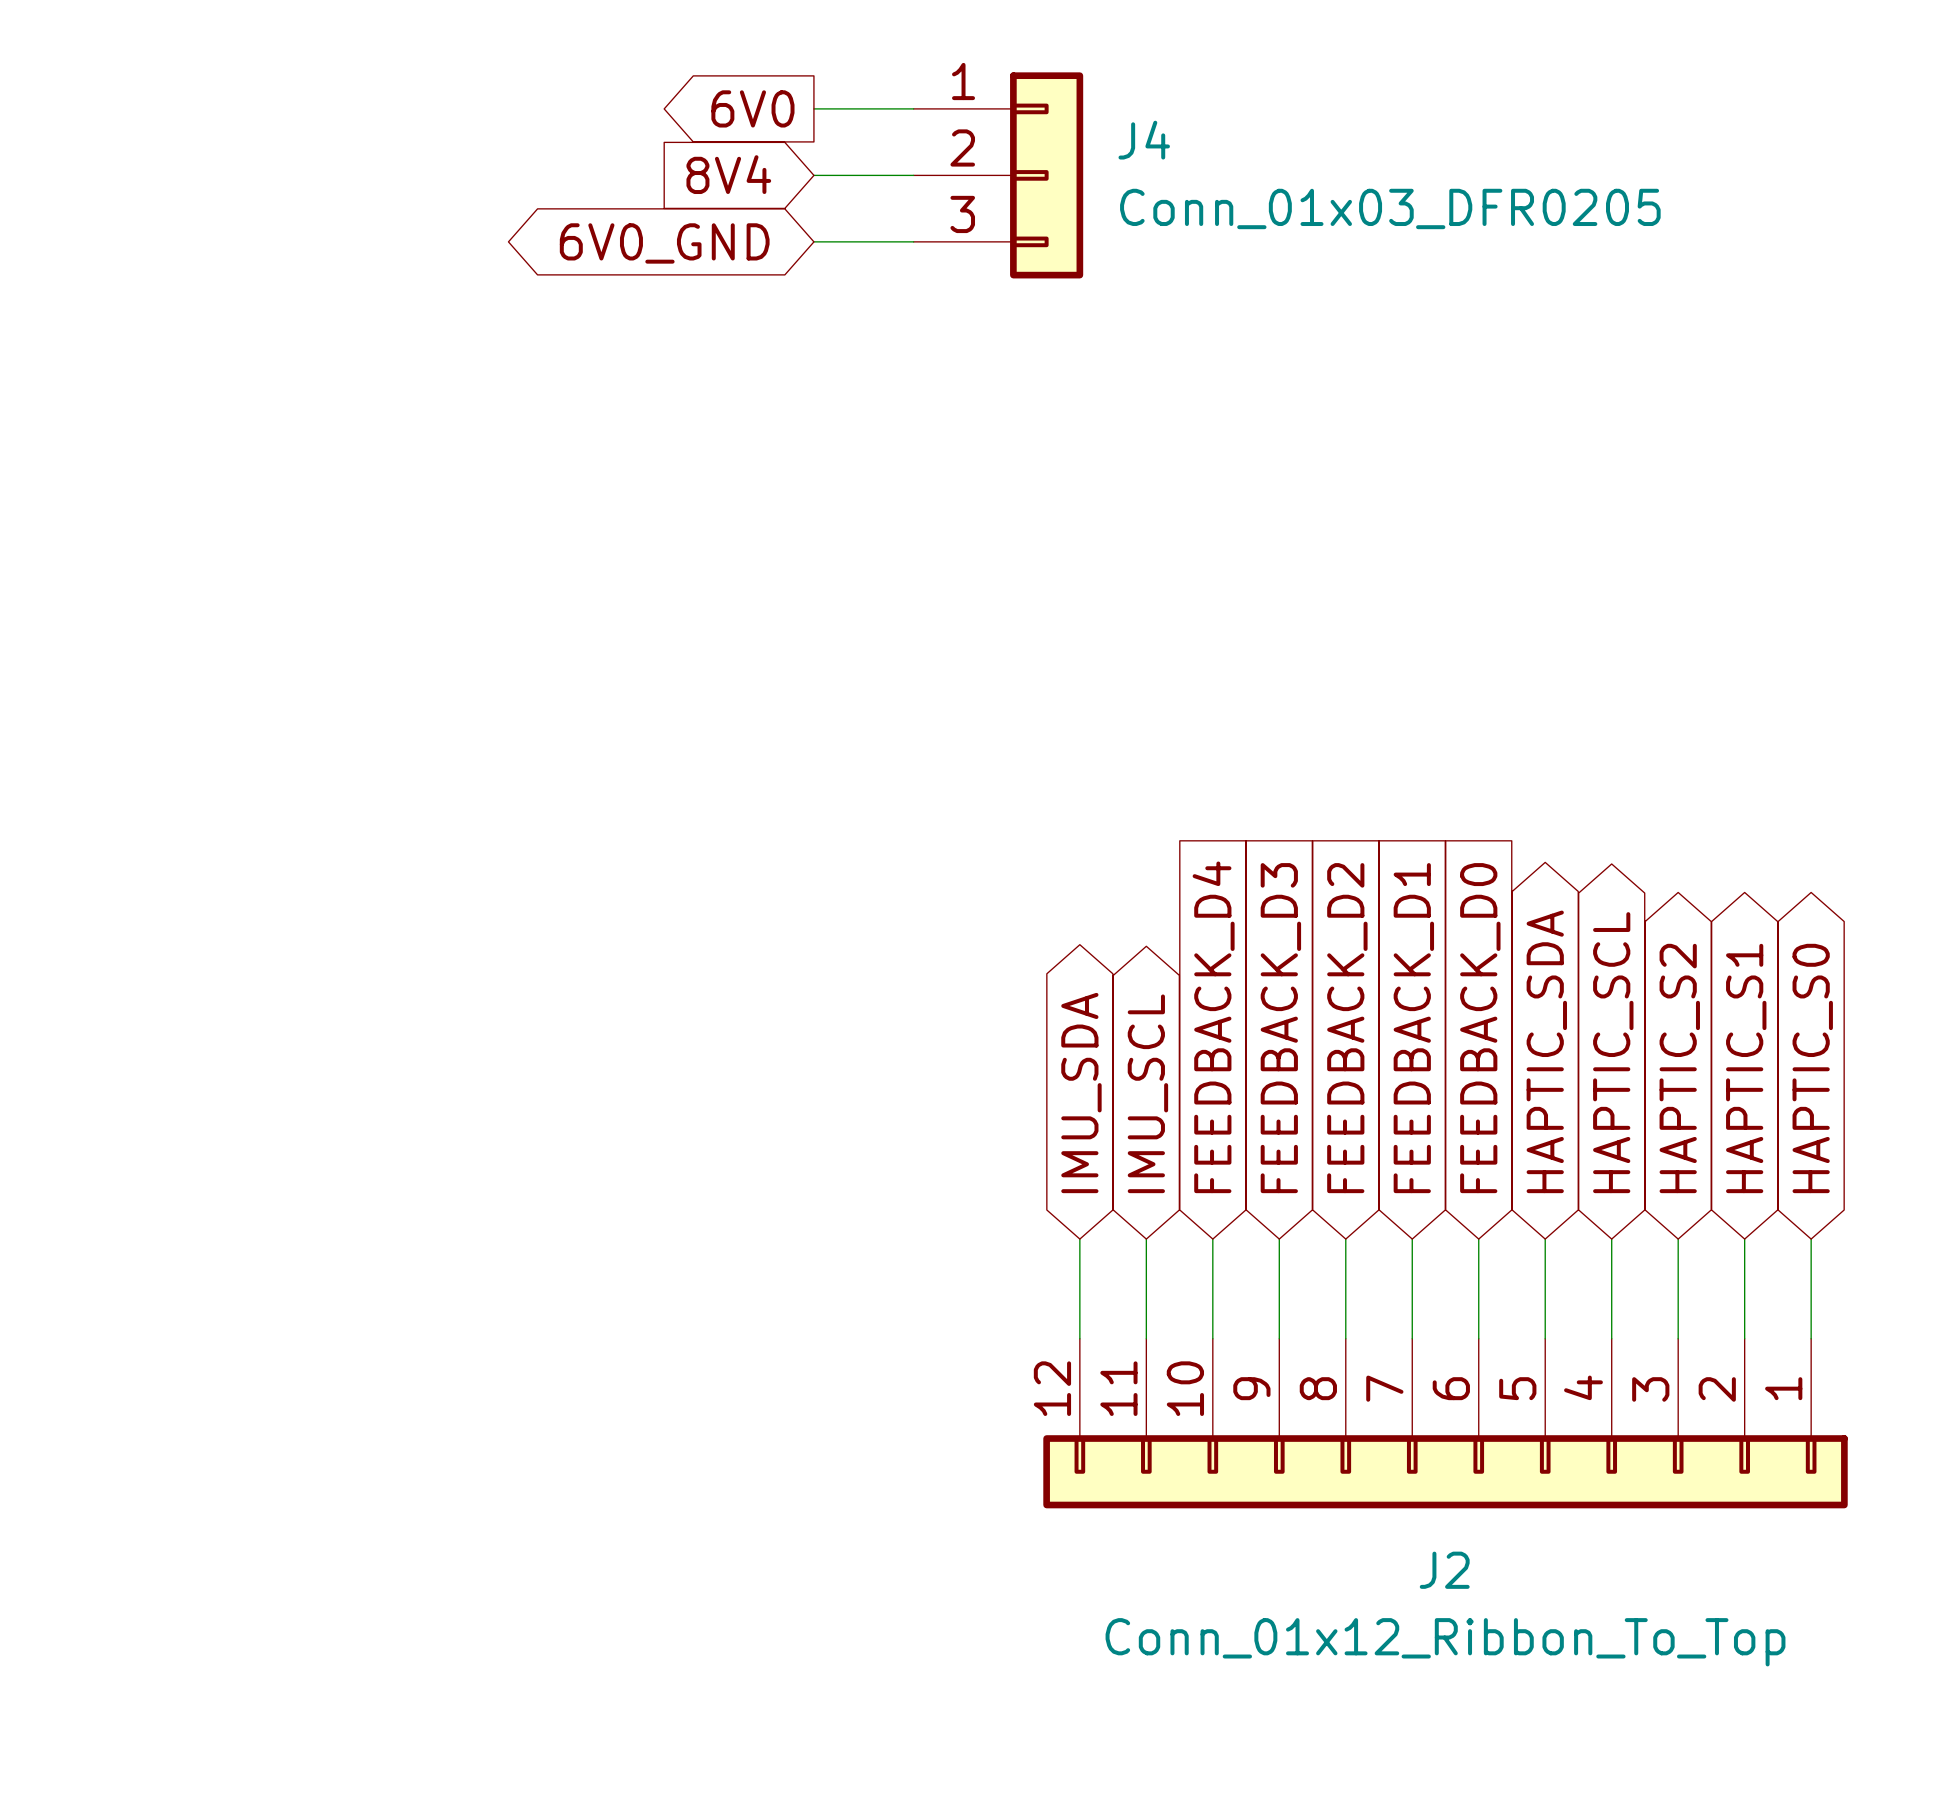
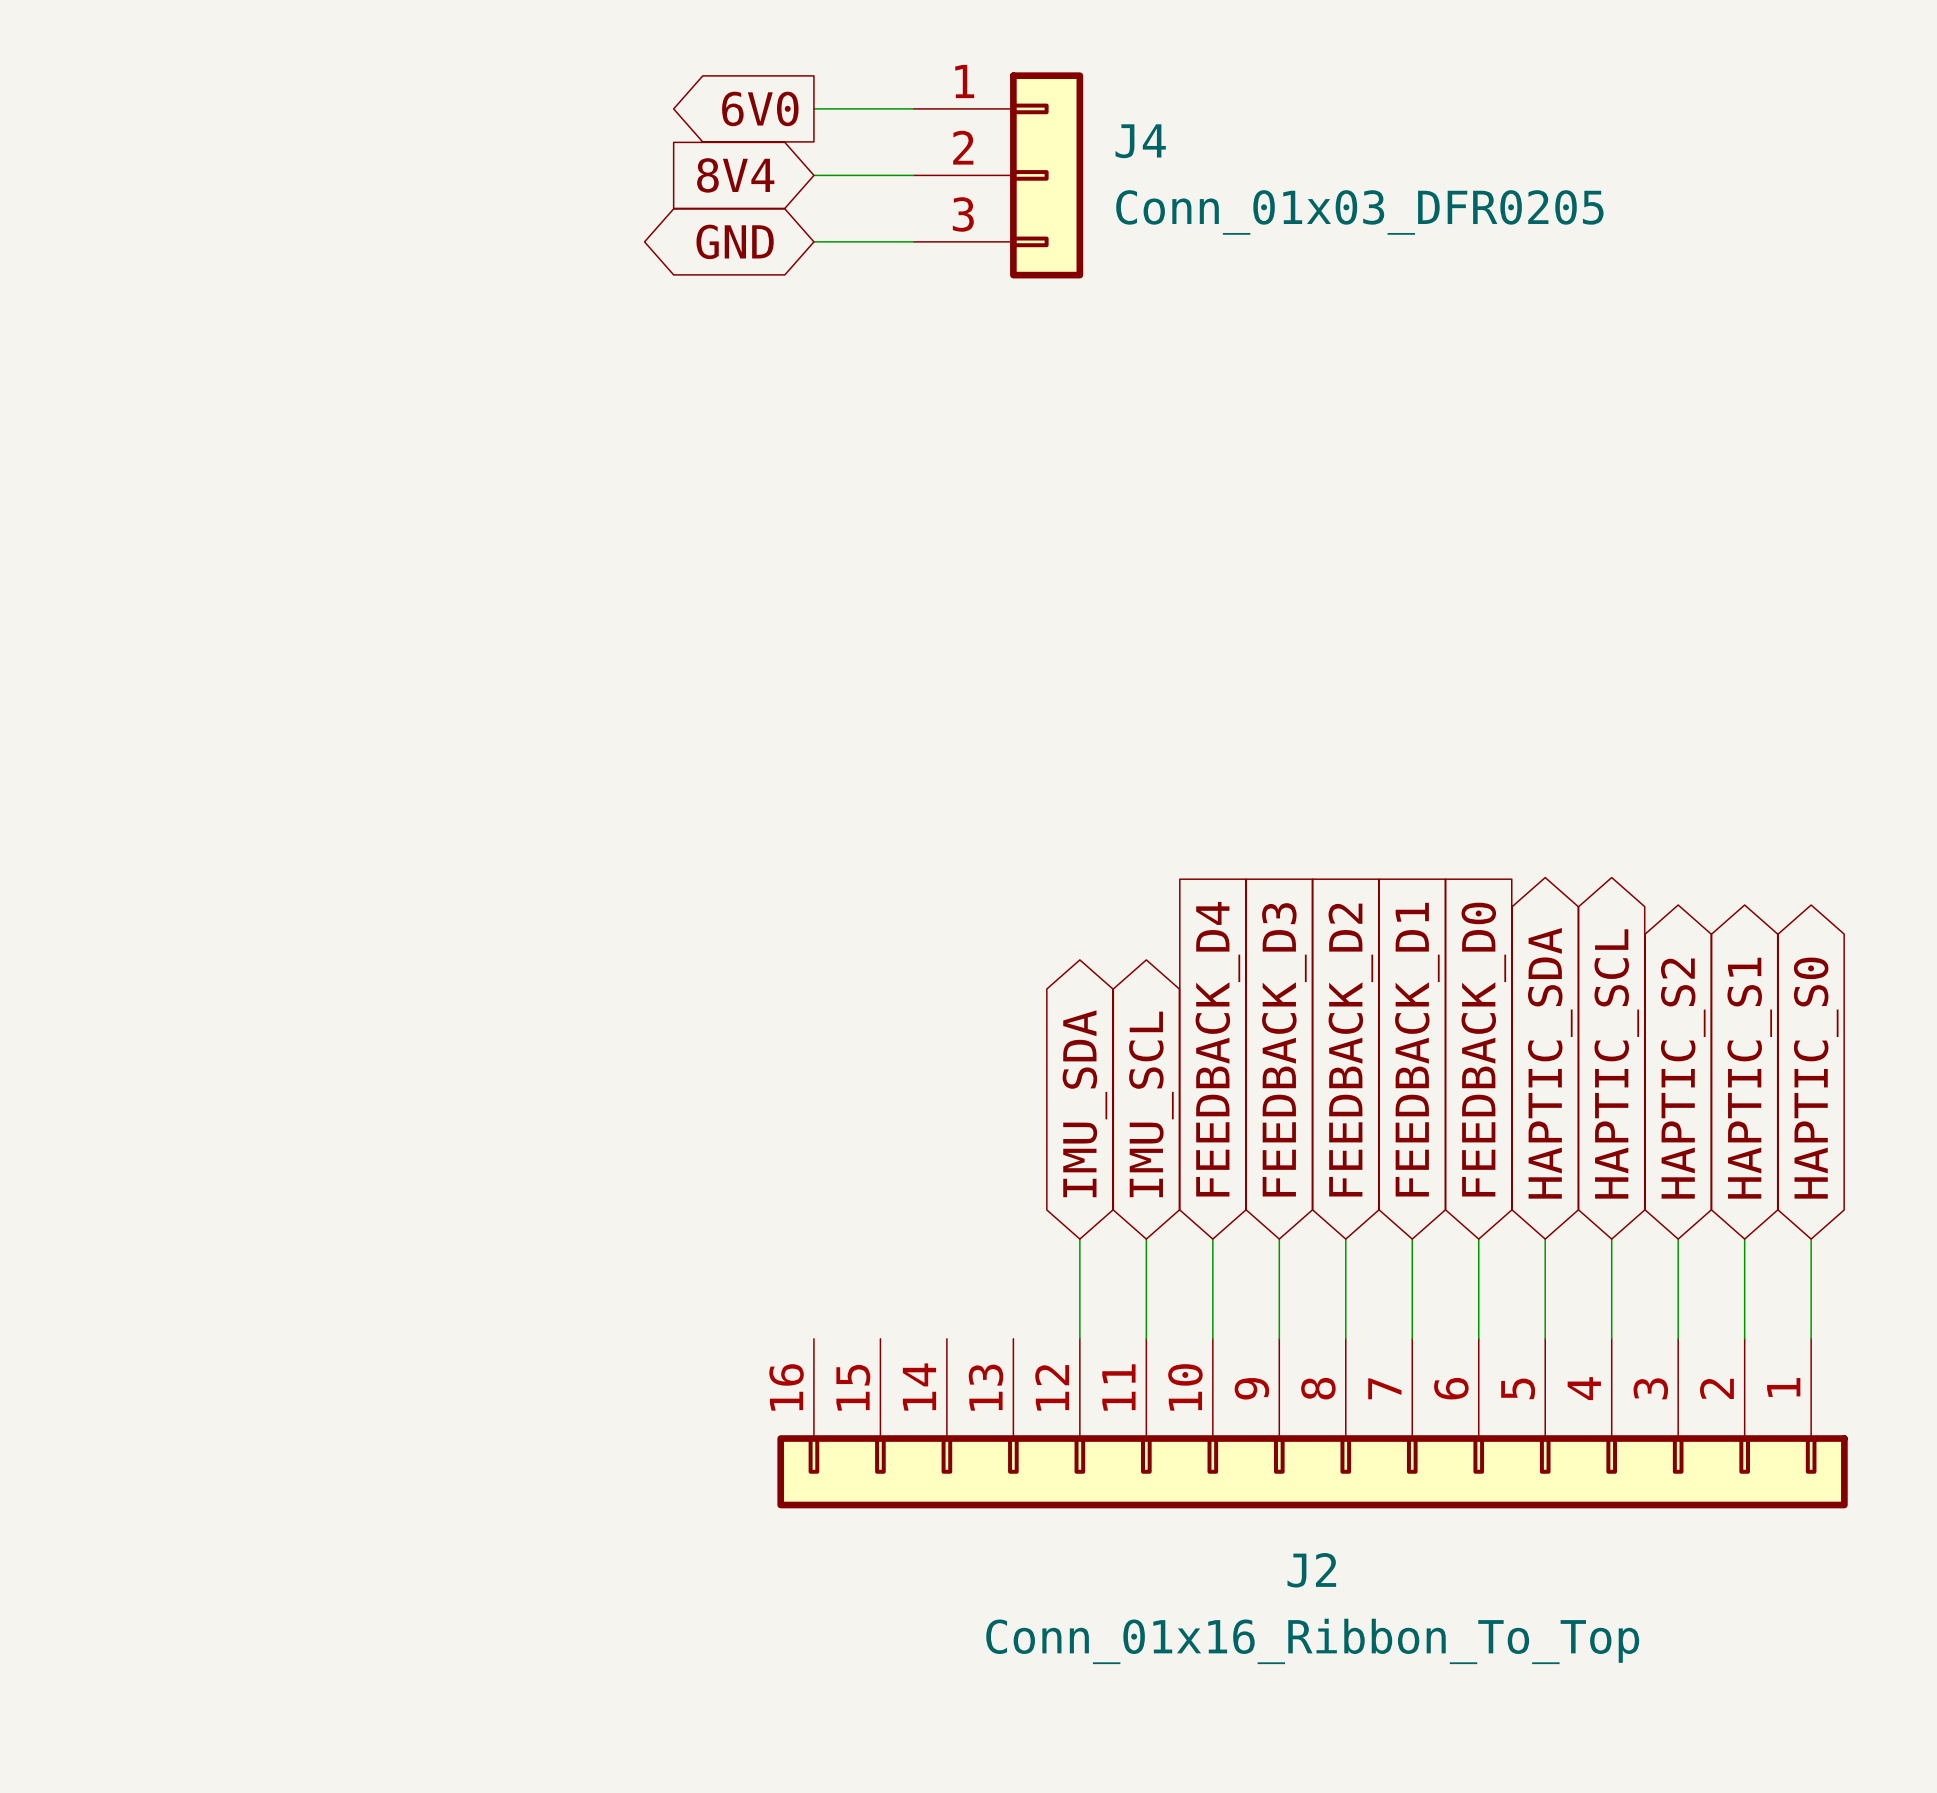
global label: 6V0_GND (664, 243) -> GND (735, 241)
J2 symbol: [1043, 1338, 1848, 1509] -> [777, 1338, 1848, 1509]
J2 value: Conn_01x12_Ribbon_To_Top (1445, 1642) -> Conn_01x16_Ribbon_To_Top (1312, 1641)

